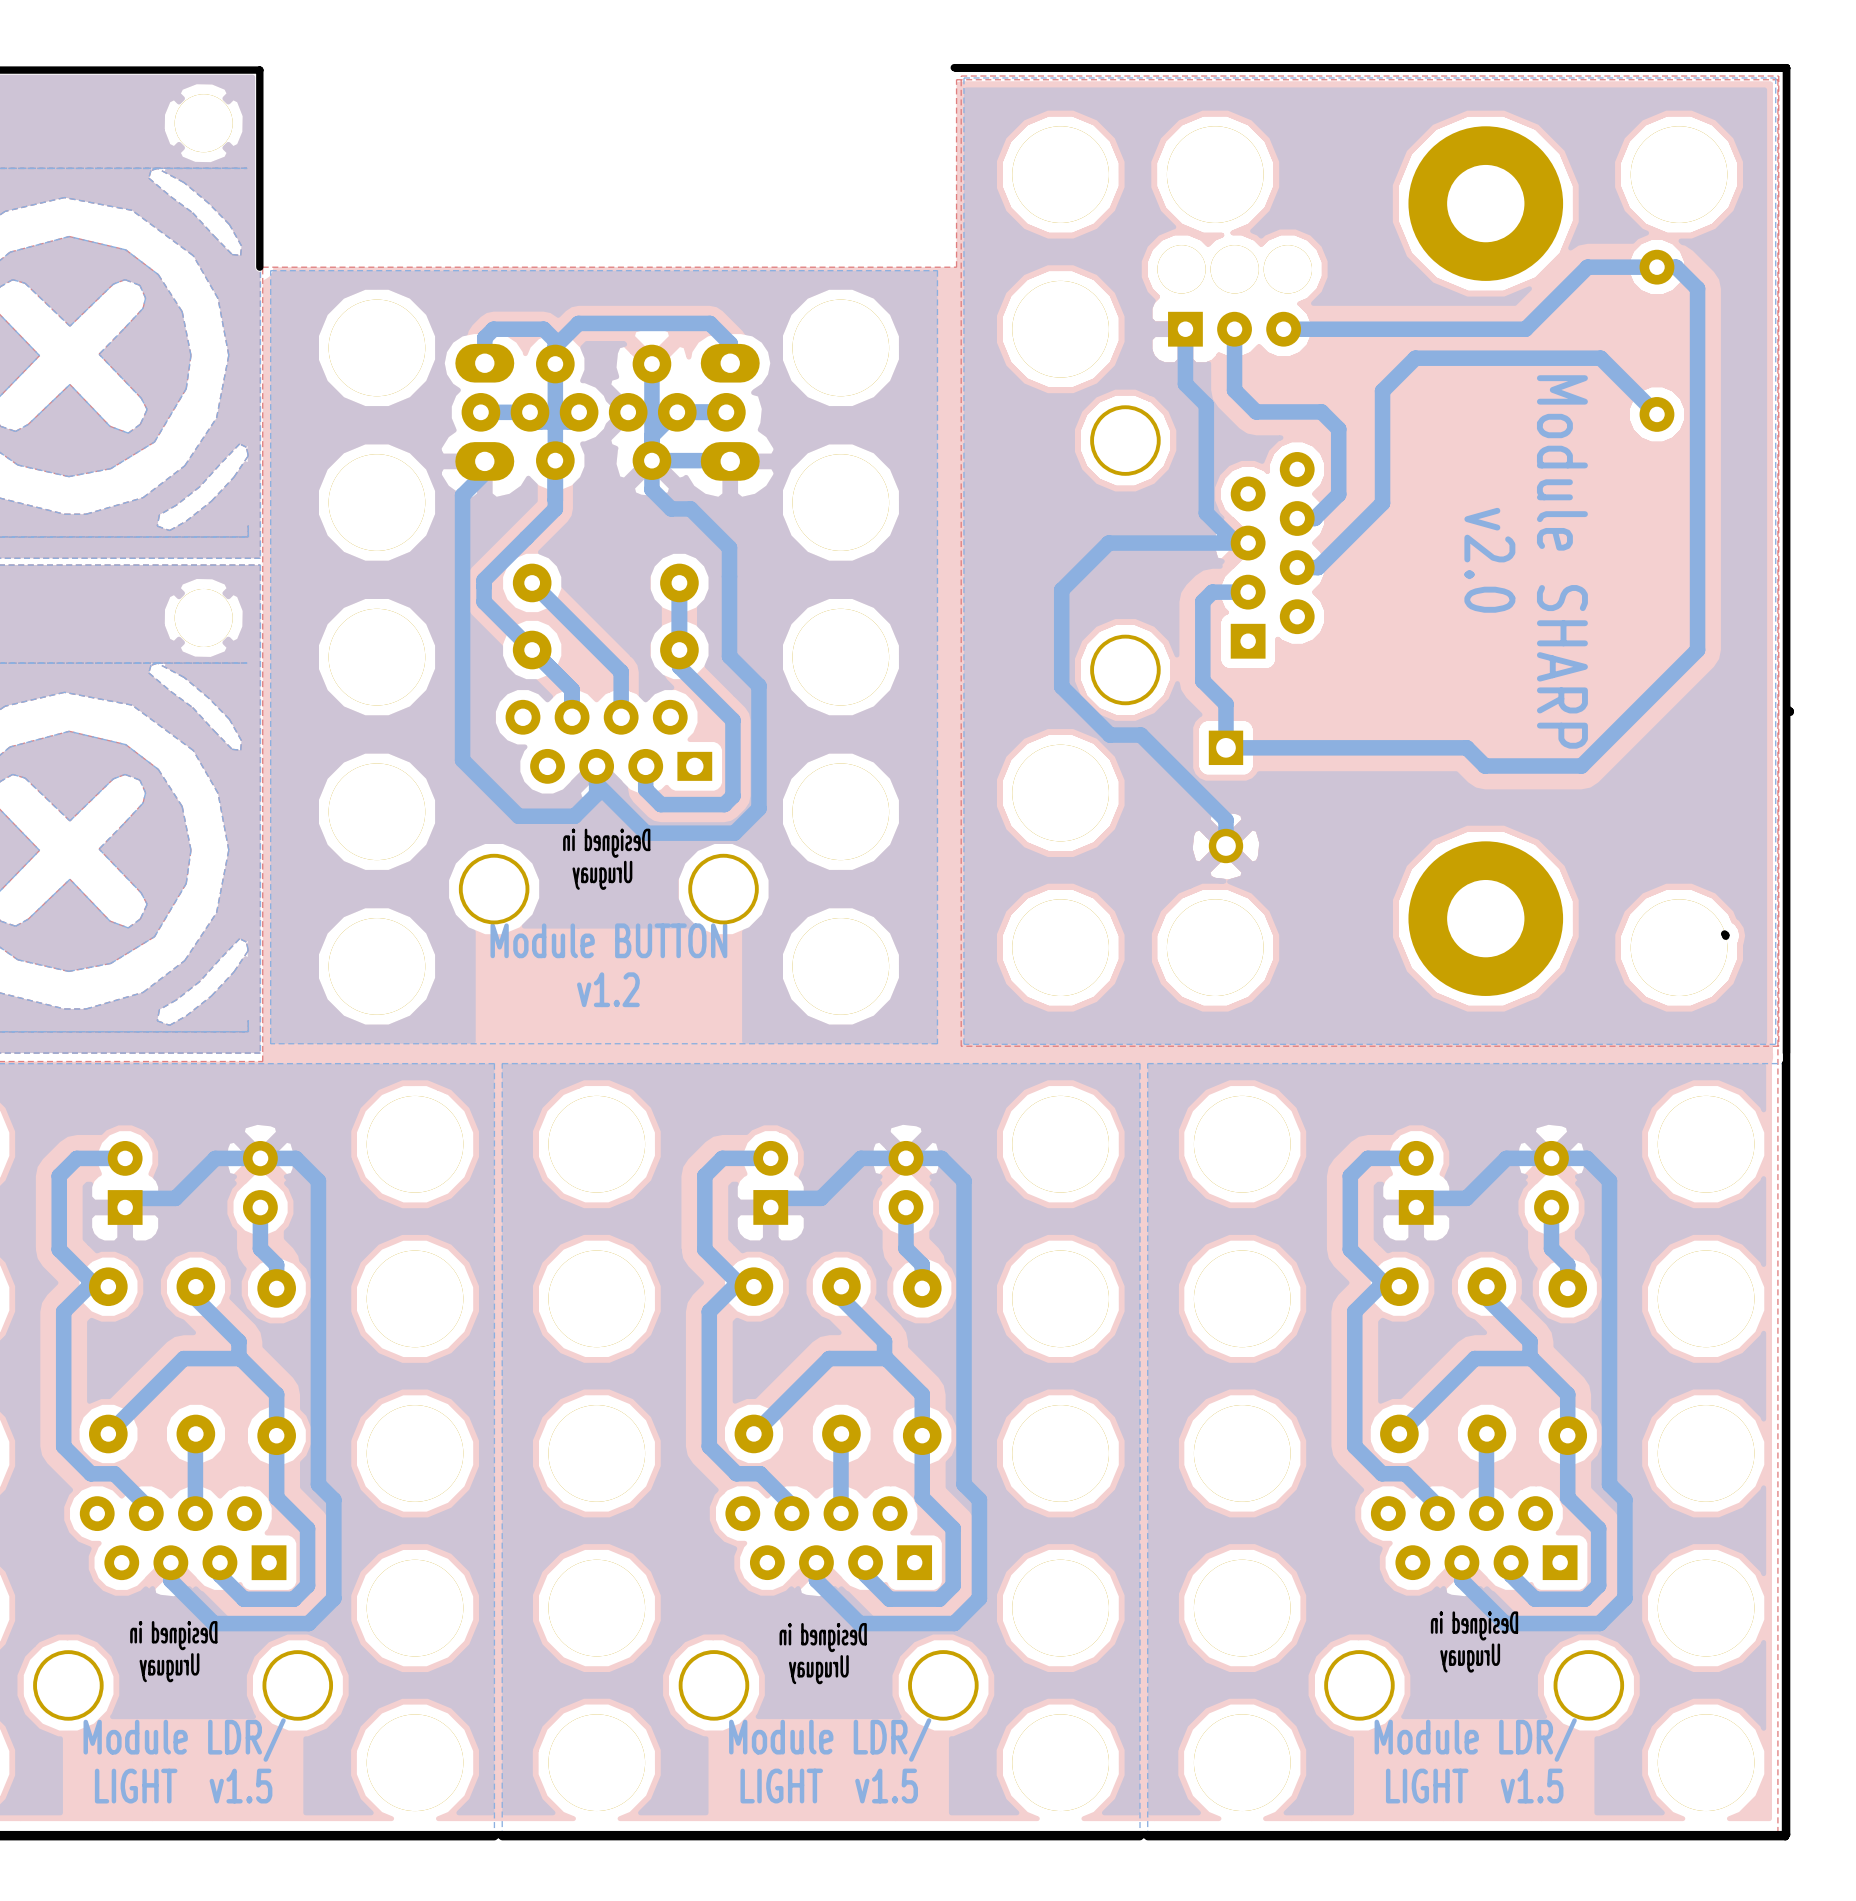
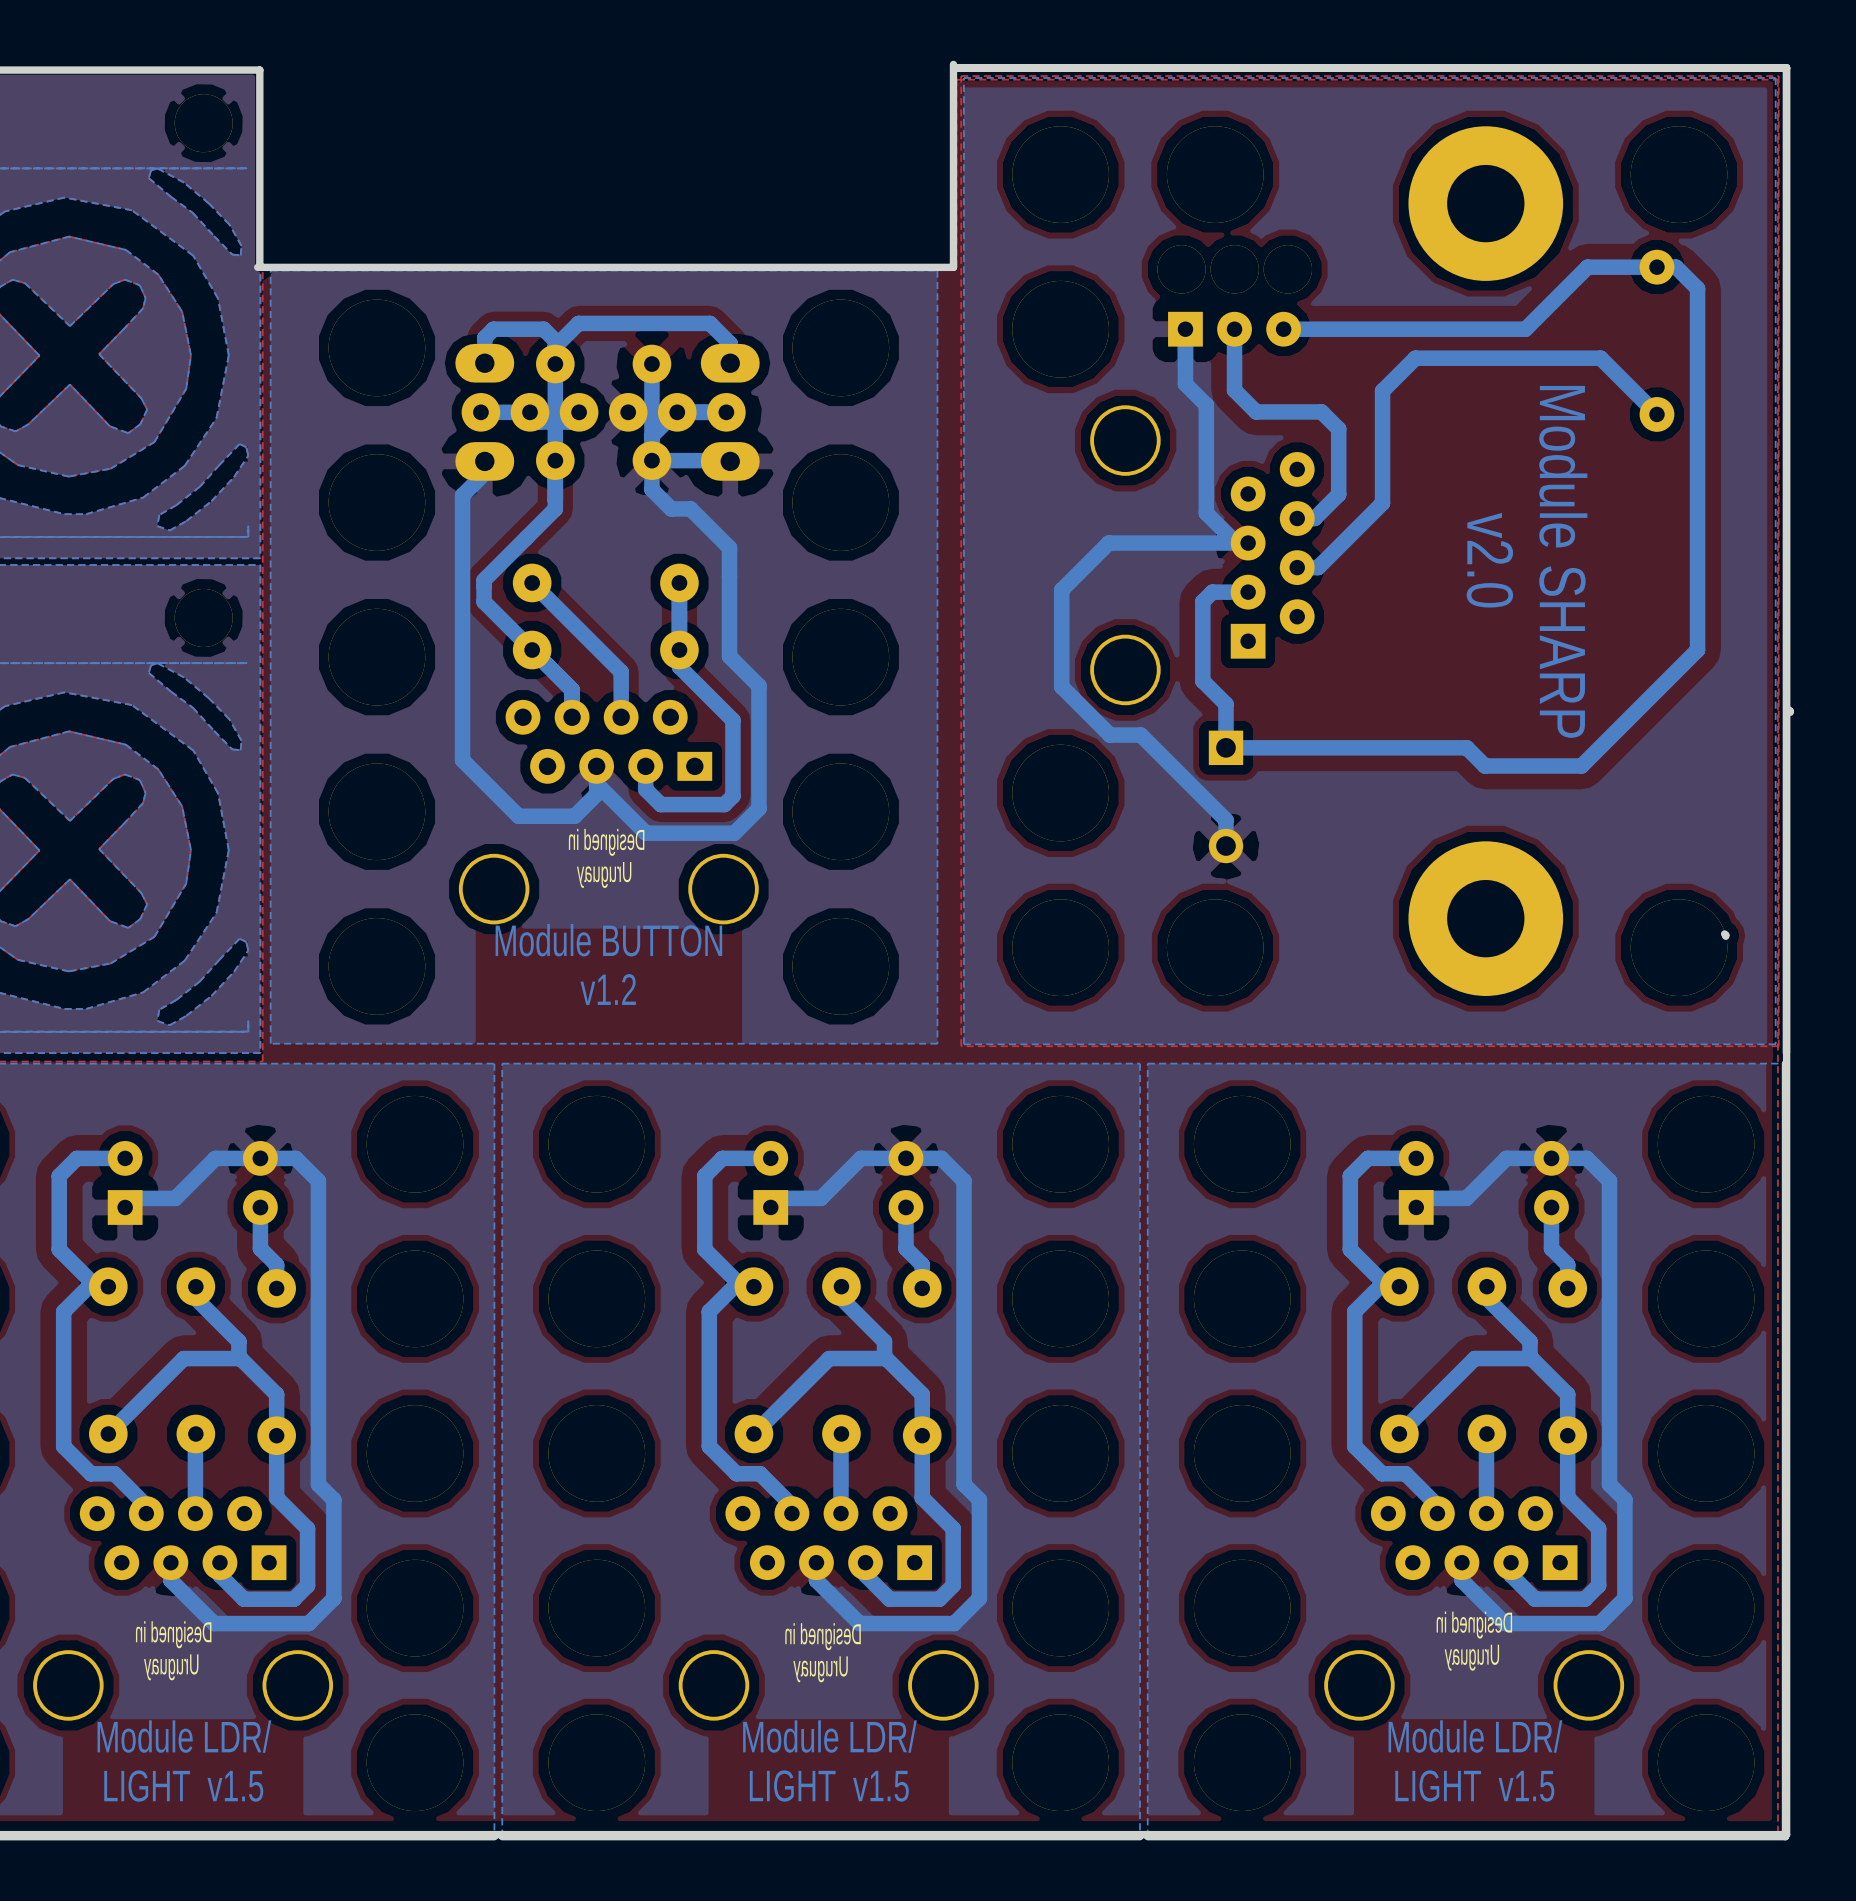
board edge: none -> (953, 64) (953, 267) (257, 267)

